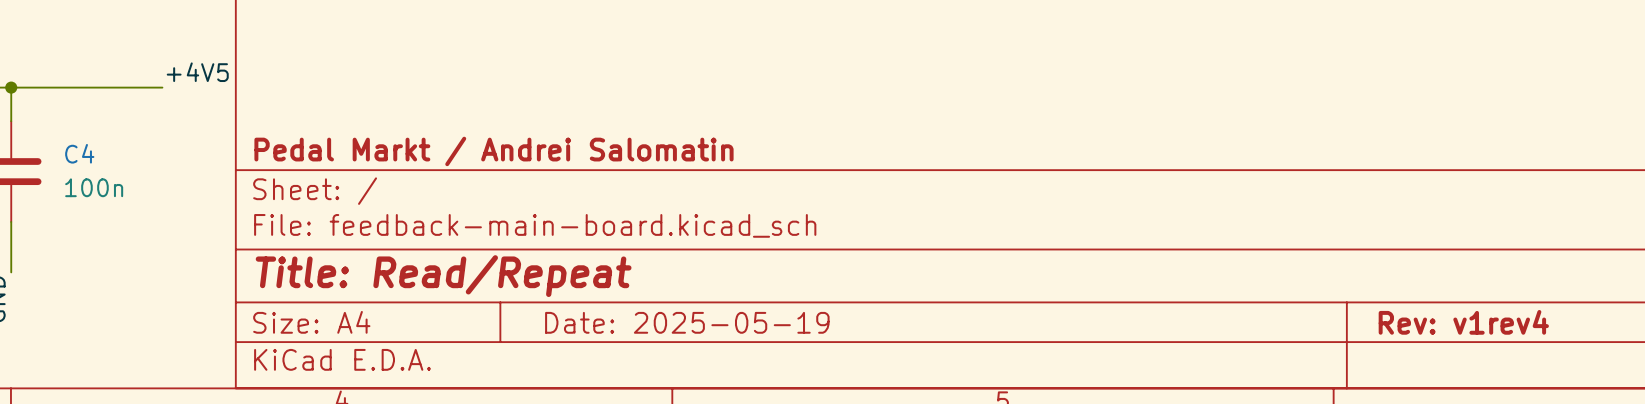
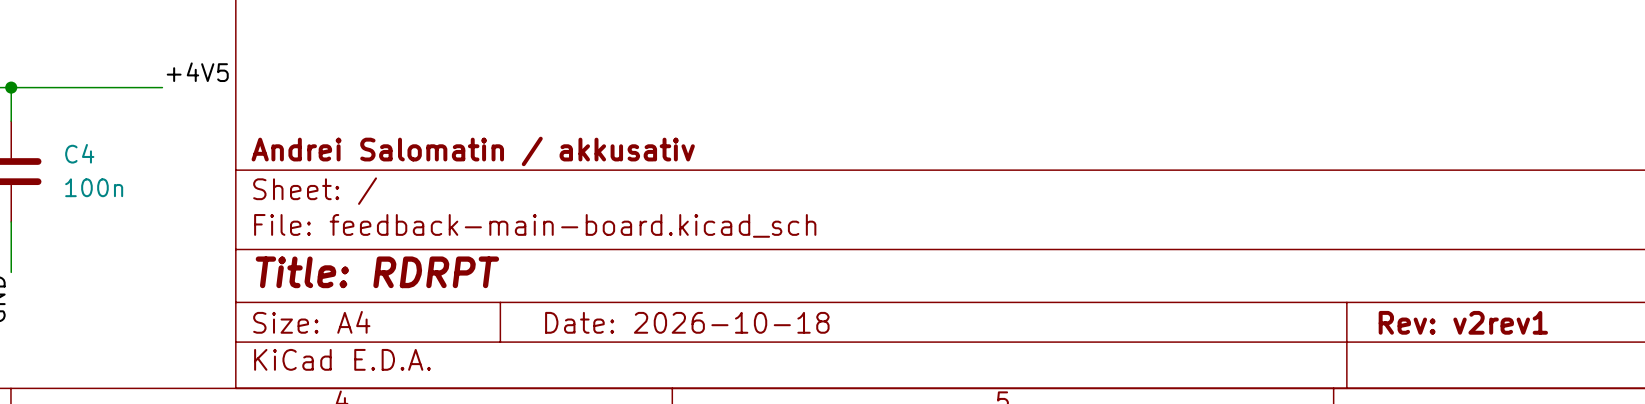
title block: Pedal Markt / Andrei Salomatin (494, 151) -> Andrei Salomatin / akkusativ (473, 151)
title block: Title: Read/Repeat (443, 276) -> Title: RDRPT (377, 272)
title block: Date: 2025-05-19 (687, 322) -> Date: 2026-10-18 (687, 322)
title block: Rev: v1rev4 (1463, 322) -> Rev: v2rev1 (1463, 322)

